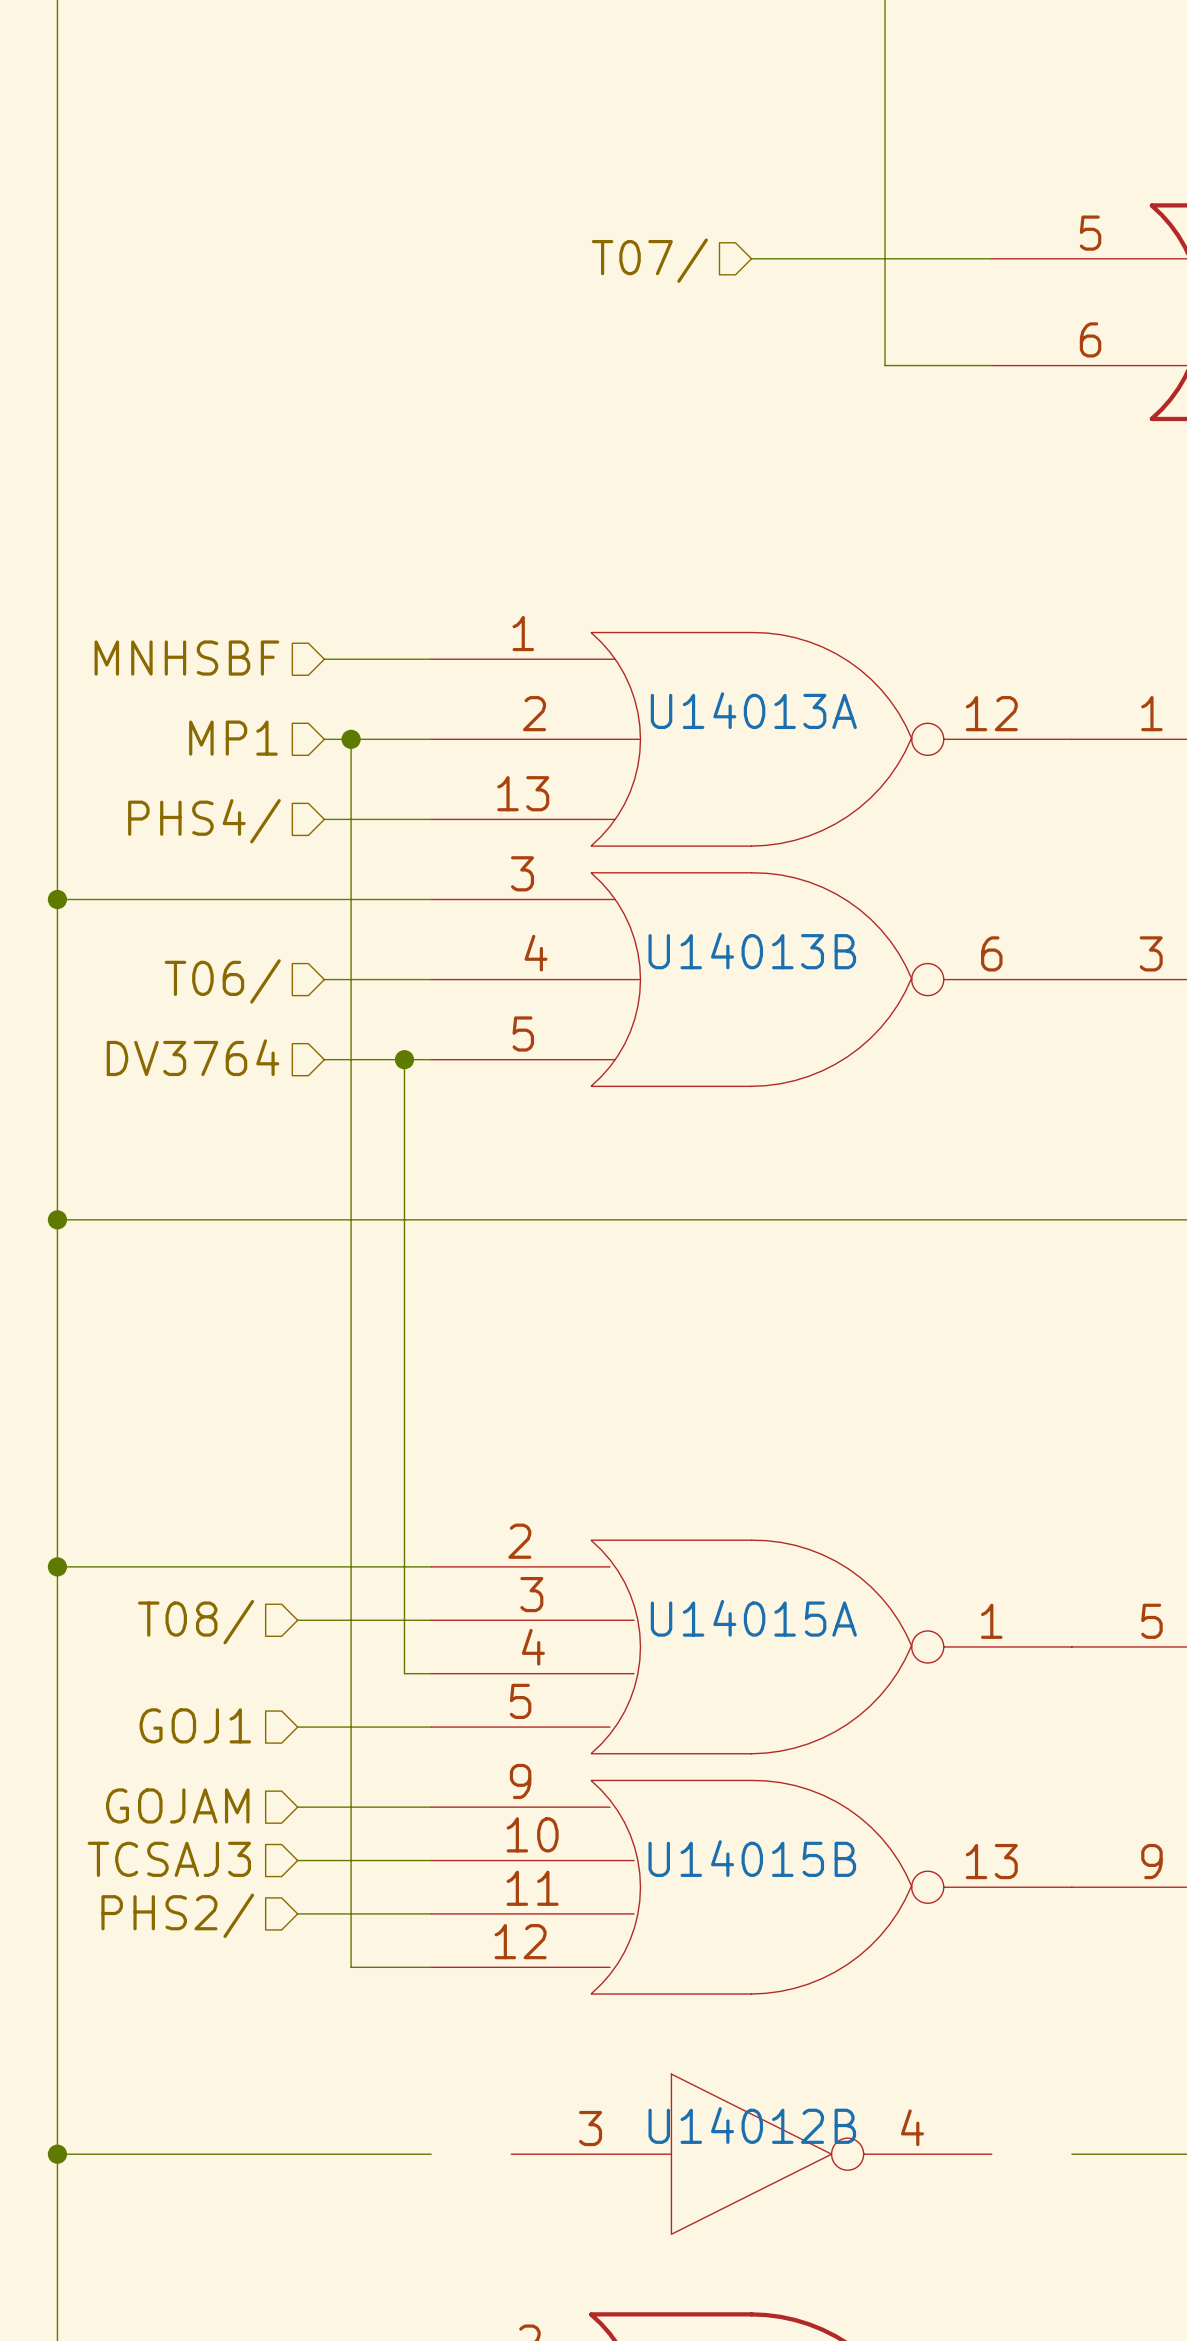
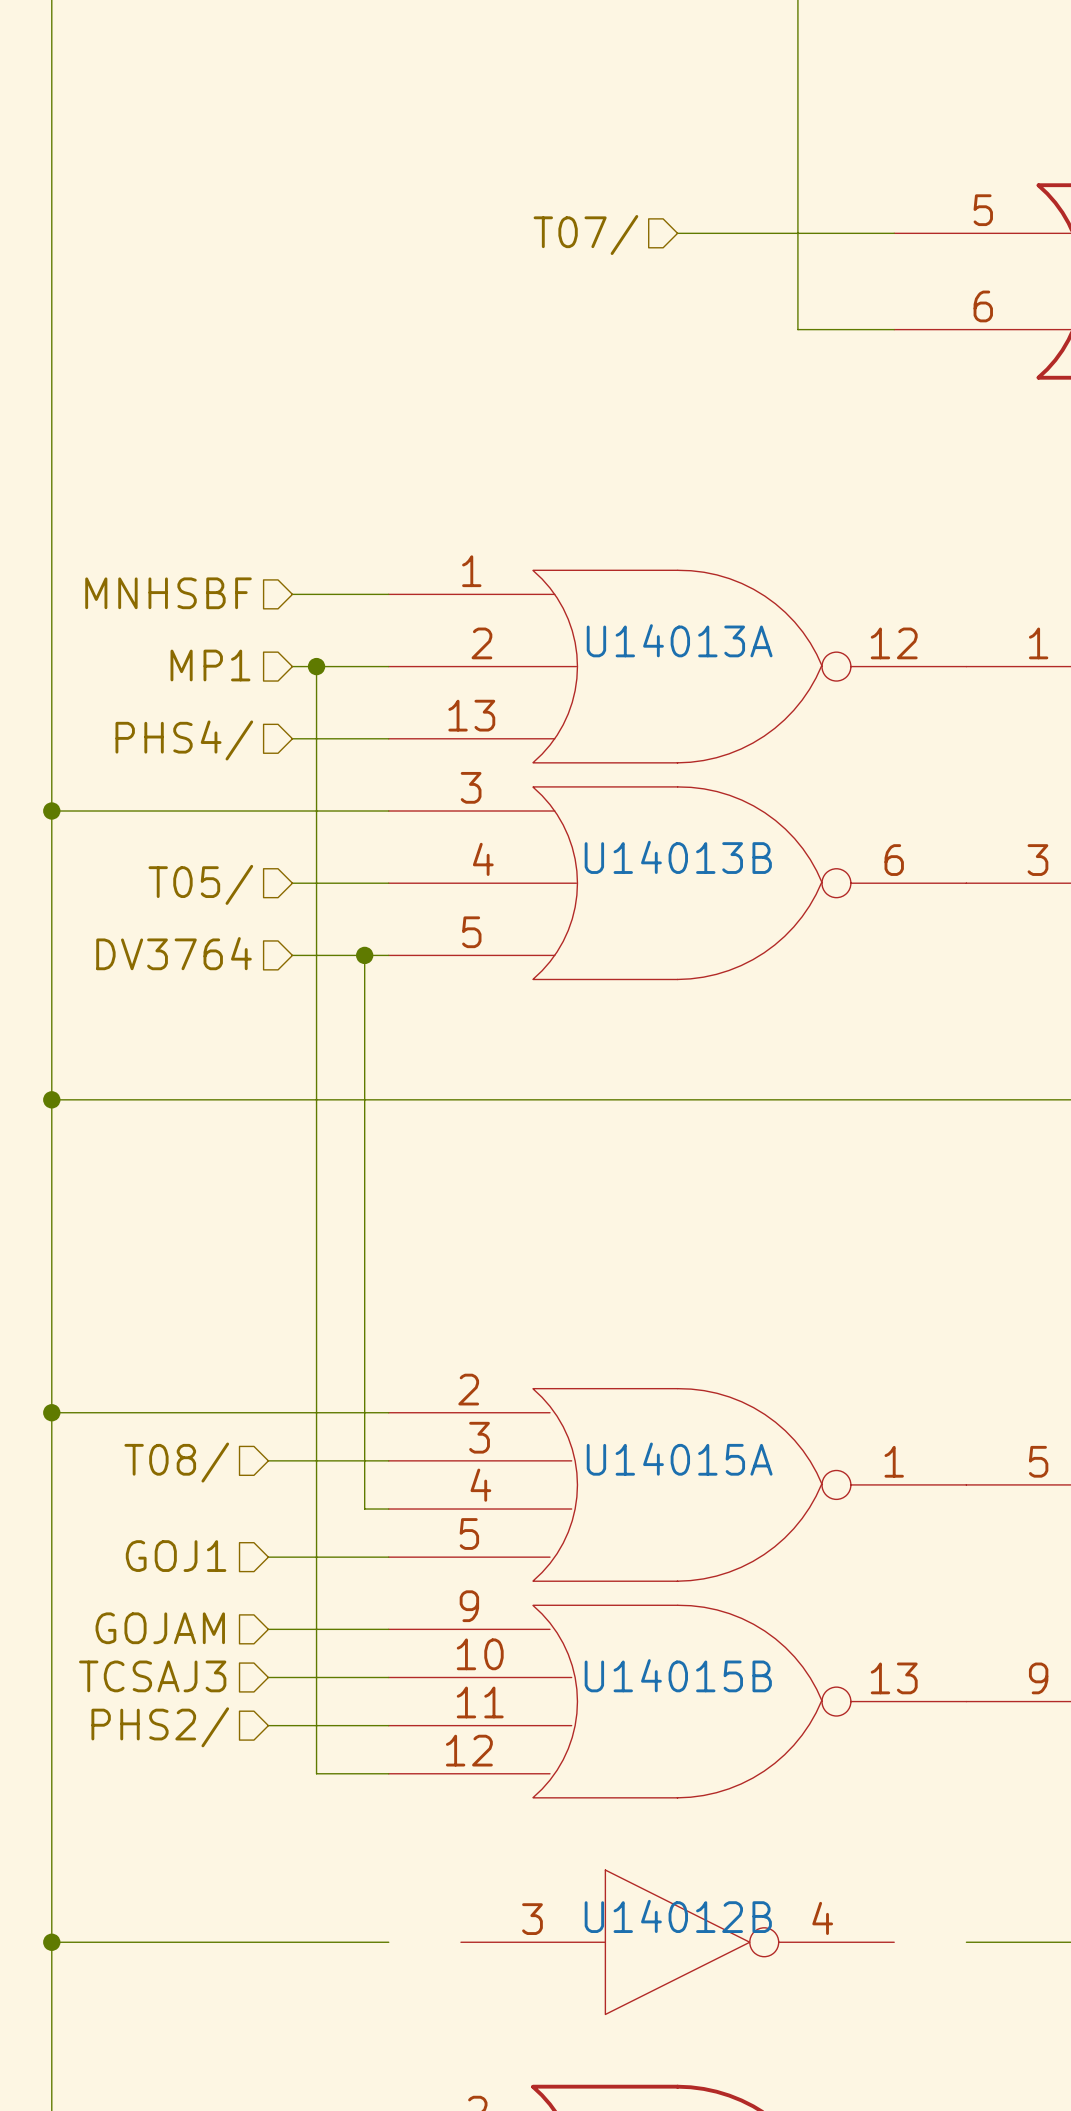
hierarchical label: T06/ (222, 981) -> T05/ (200, 884)

